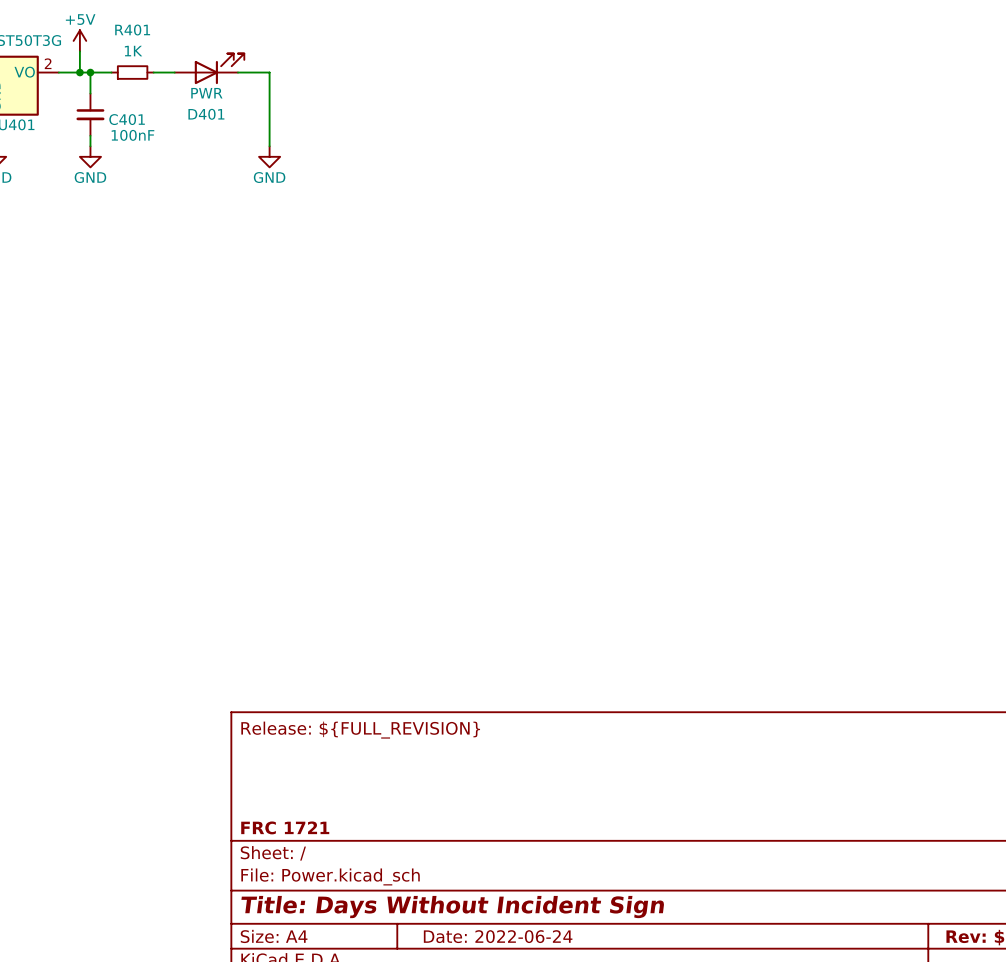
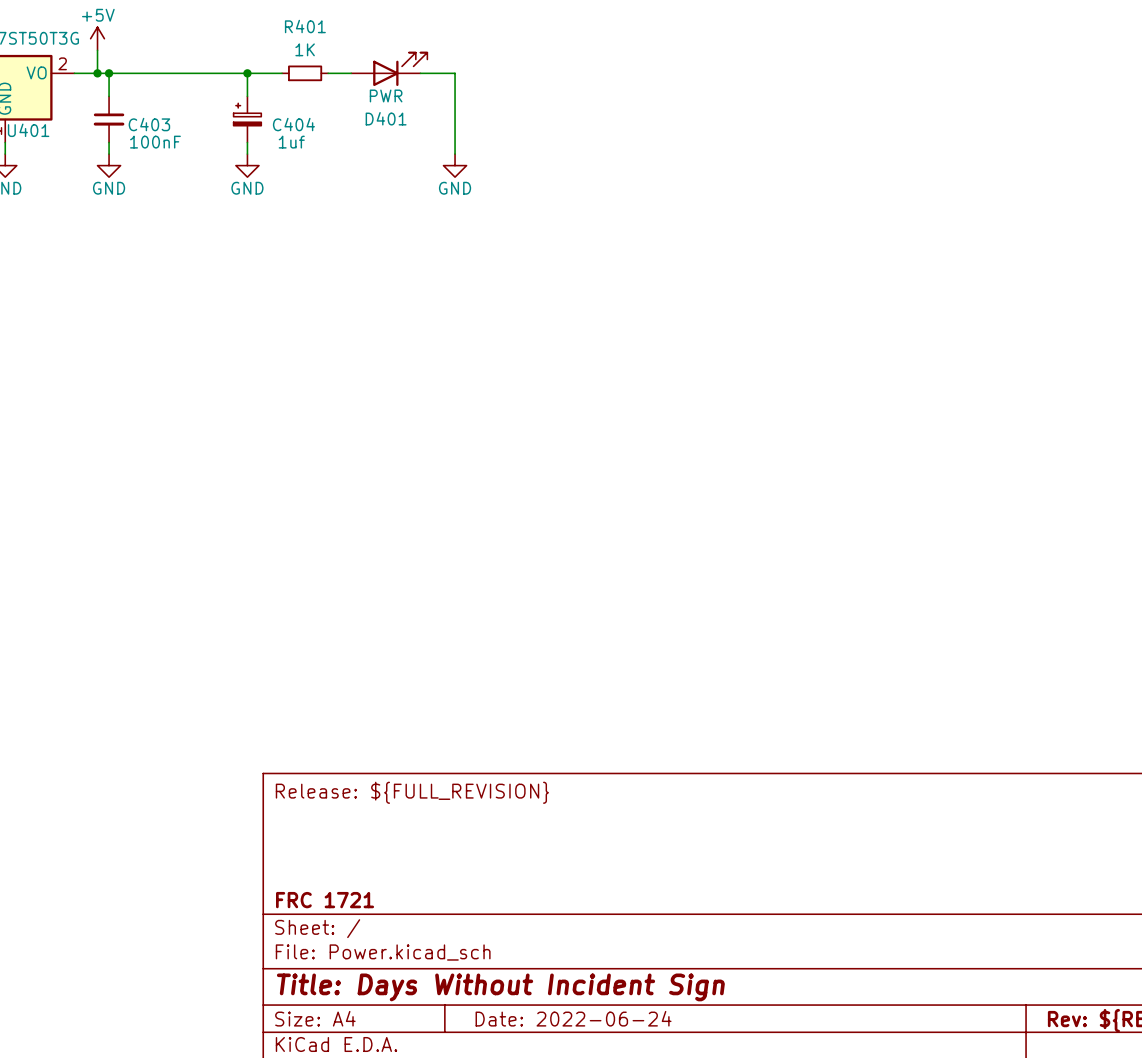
D401 position: (209, 68) -> (389, 69)
wire: none -> (132, 73) (178, 73)
R401 position: (132, 72) -> (305, 73)
junction: none -> (247, 73)
wire: (248, 72) (269, 72) (269, 146) -> none
wire: none -> (328, 73) (351, 73)
wire: none -> (420, 73) (455, 73) (455, 154)
C404: none -> 1uf (247, 119)
C401 name: C401 (127, 119) -> C403 (149, 124)
wire: none -> (247, 142) (247, 154)
power symbol position: GND (269, 156) -> GND (247, 165)
power symbol: none -> GND (455, 165)

